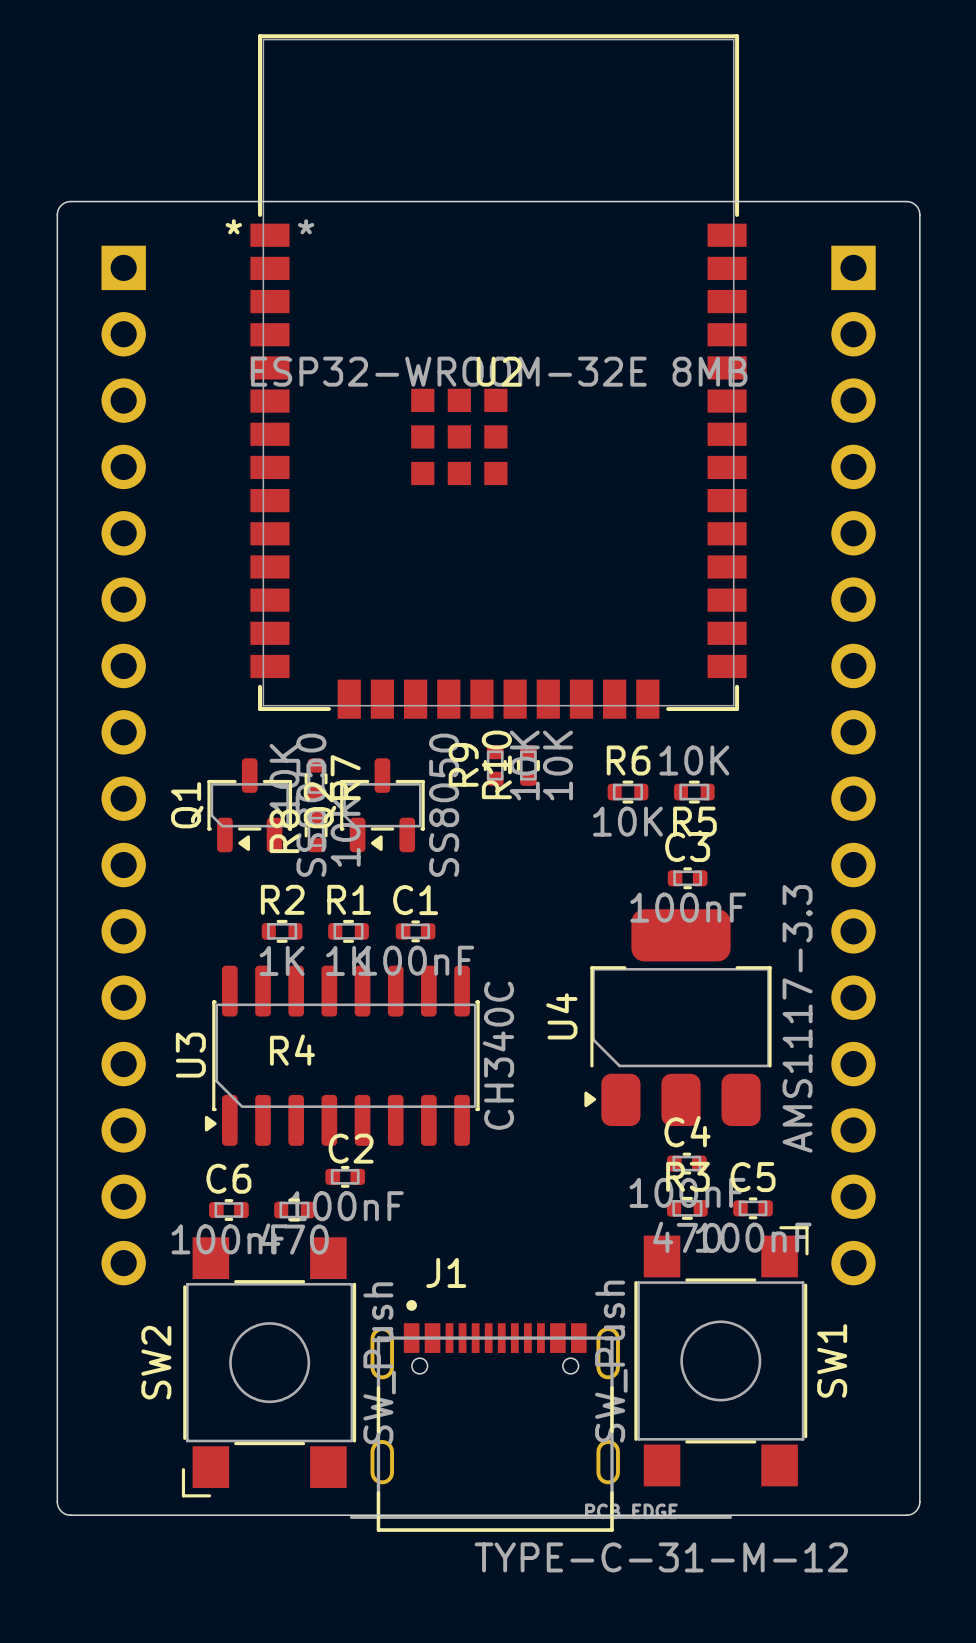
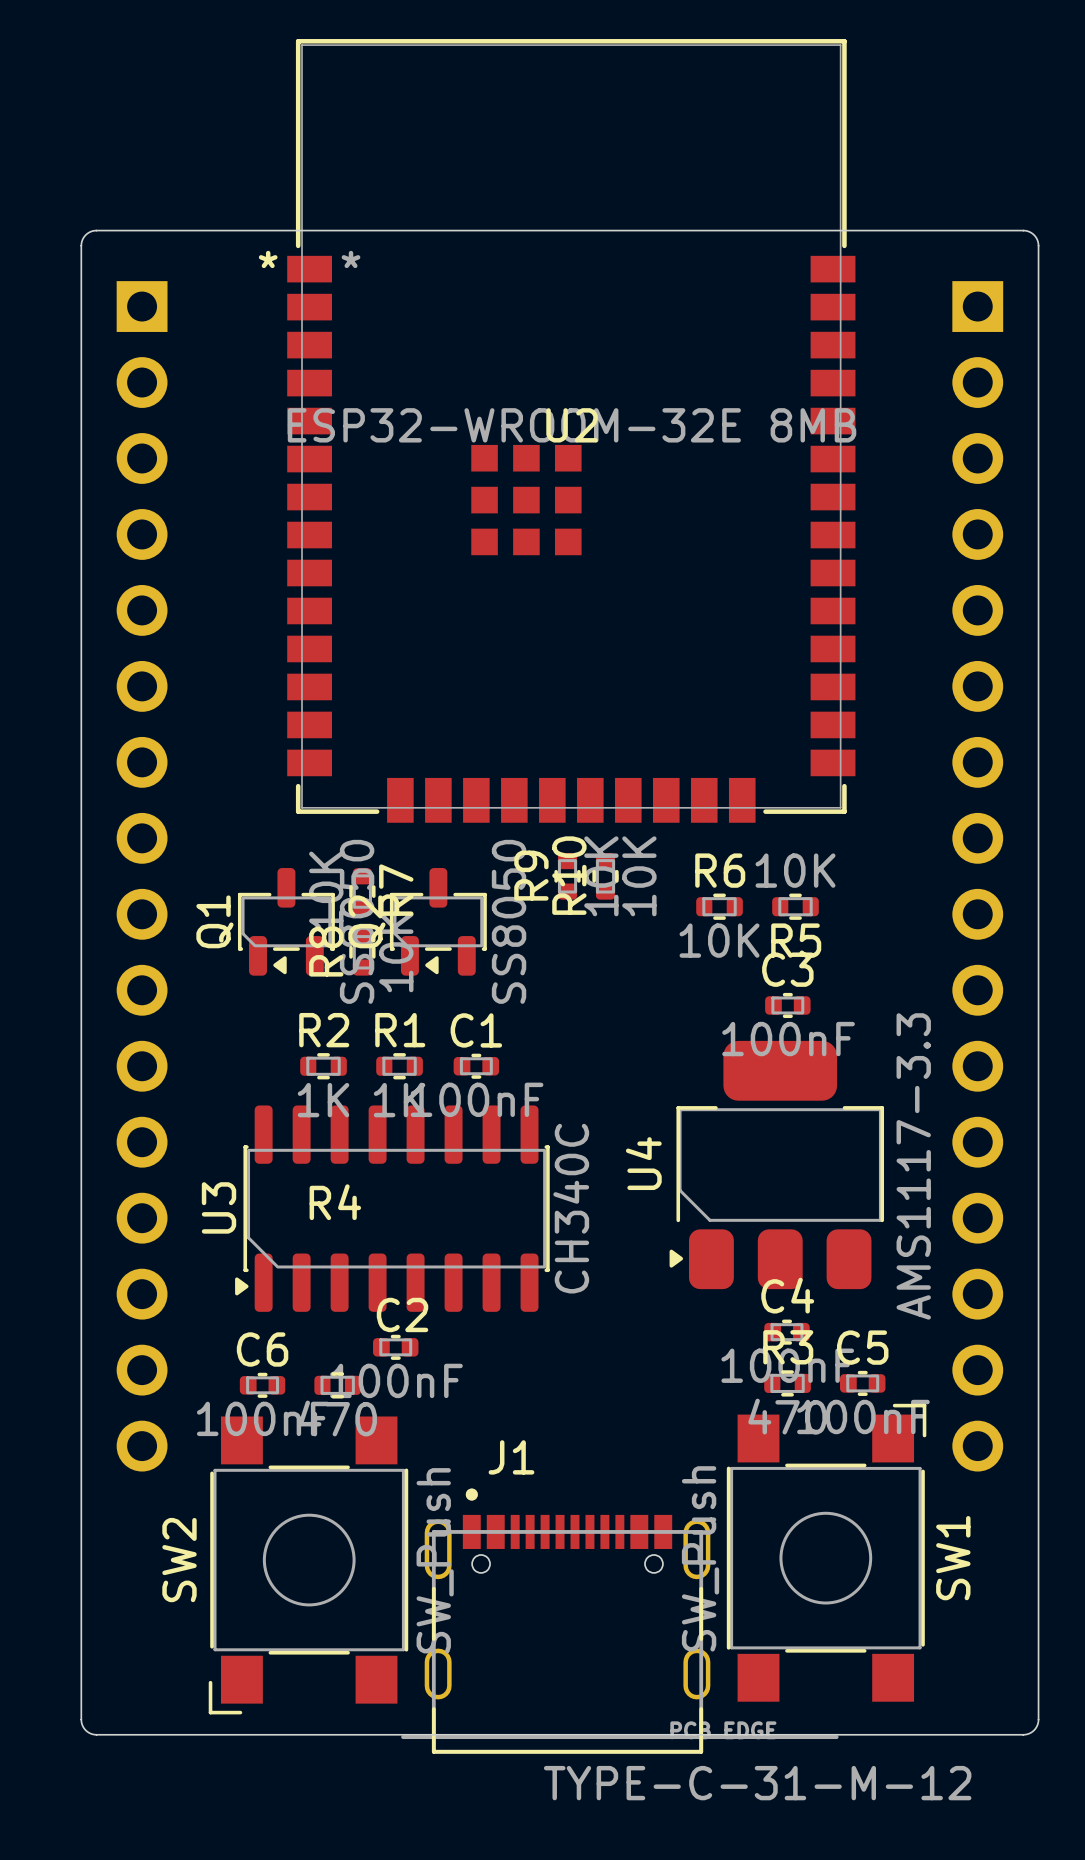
board edge: (83, 201) (63, 203) (59, 208) (57, 214) (57, 1501) (59, 1508) (63, 1513) (83, 1515) -> (96, 230) (85, 235) (81, 245) (81, 1719) (85, 1730) (96, 1734)
board edge: (893, 201) (913, 203) (918, 208) (919, 214) (919, 1501) (918, 1508) (913, 1513) (893, 1515) -> (1023, 230) (1034, 235) (1038, 245) (1038, 1719) (1034, 1730) (1023, 1734)

